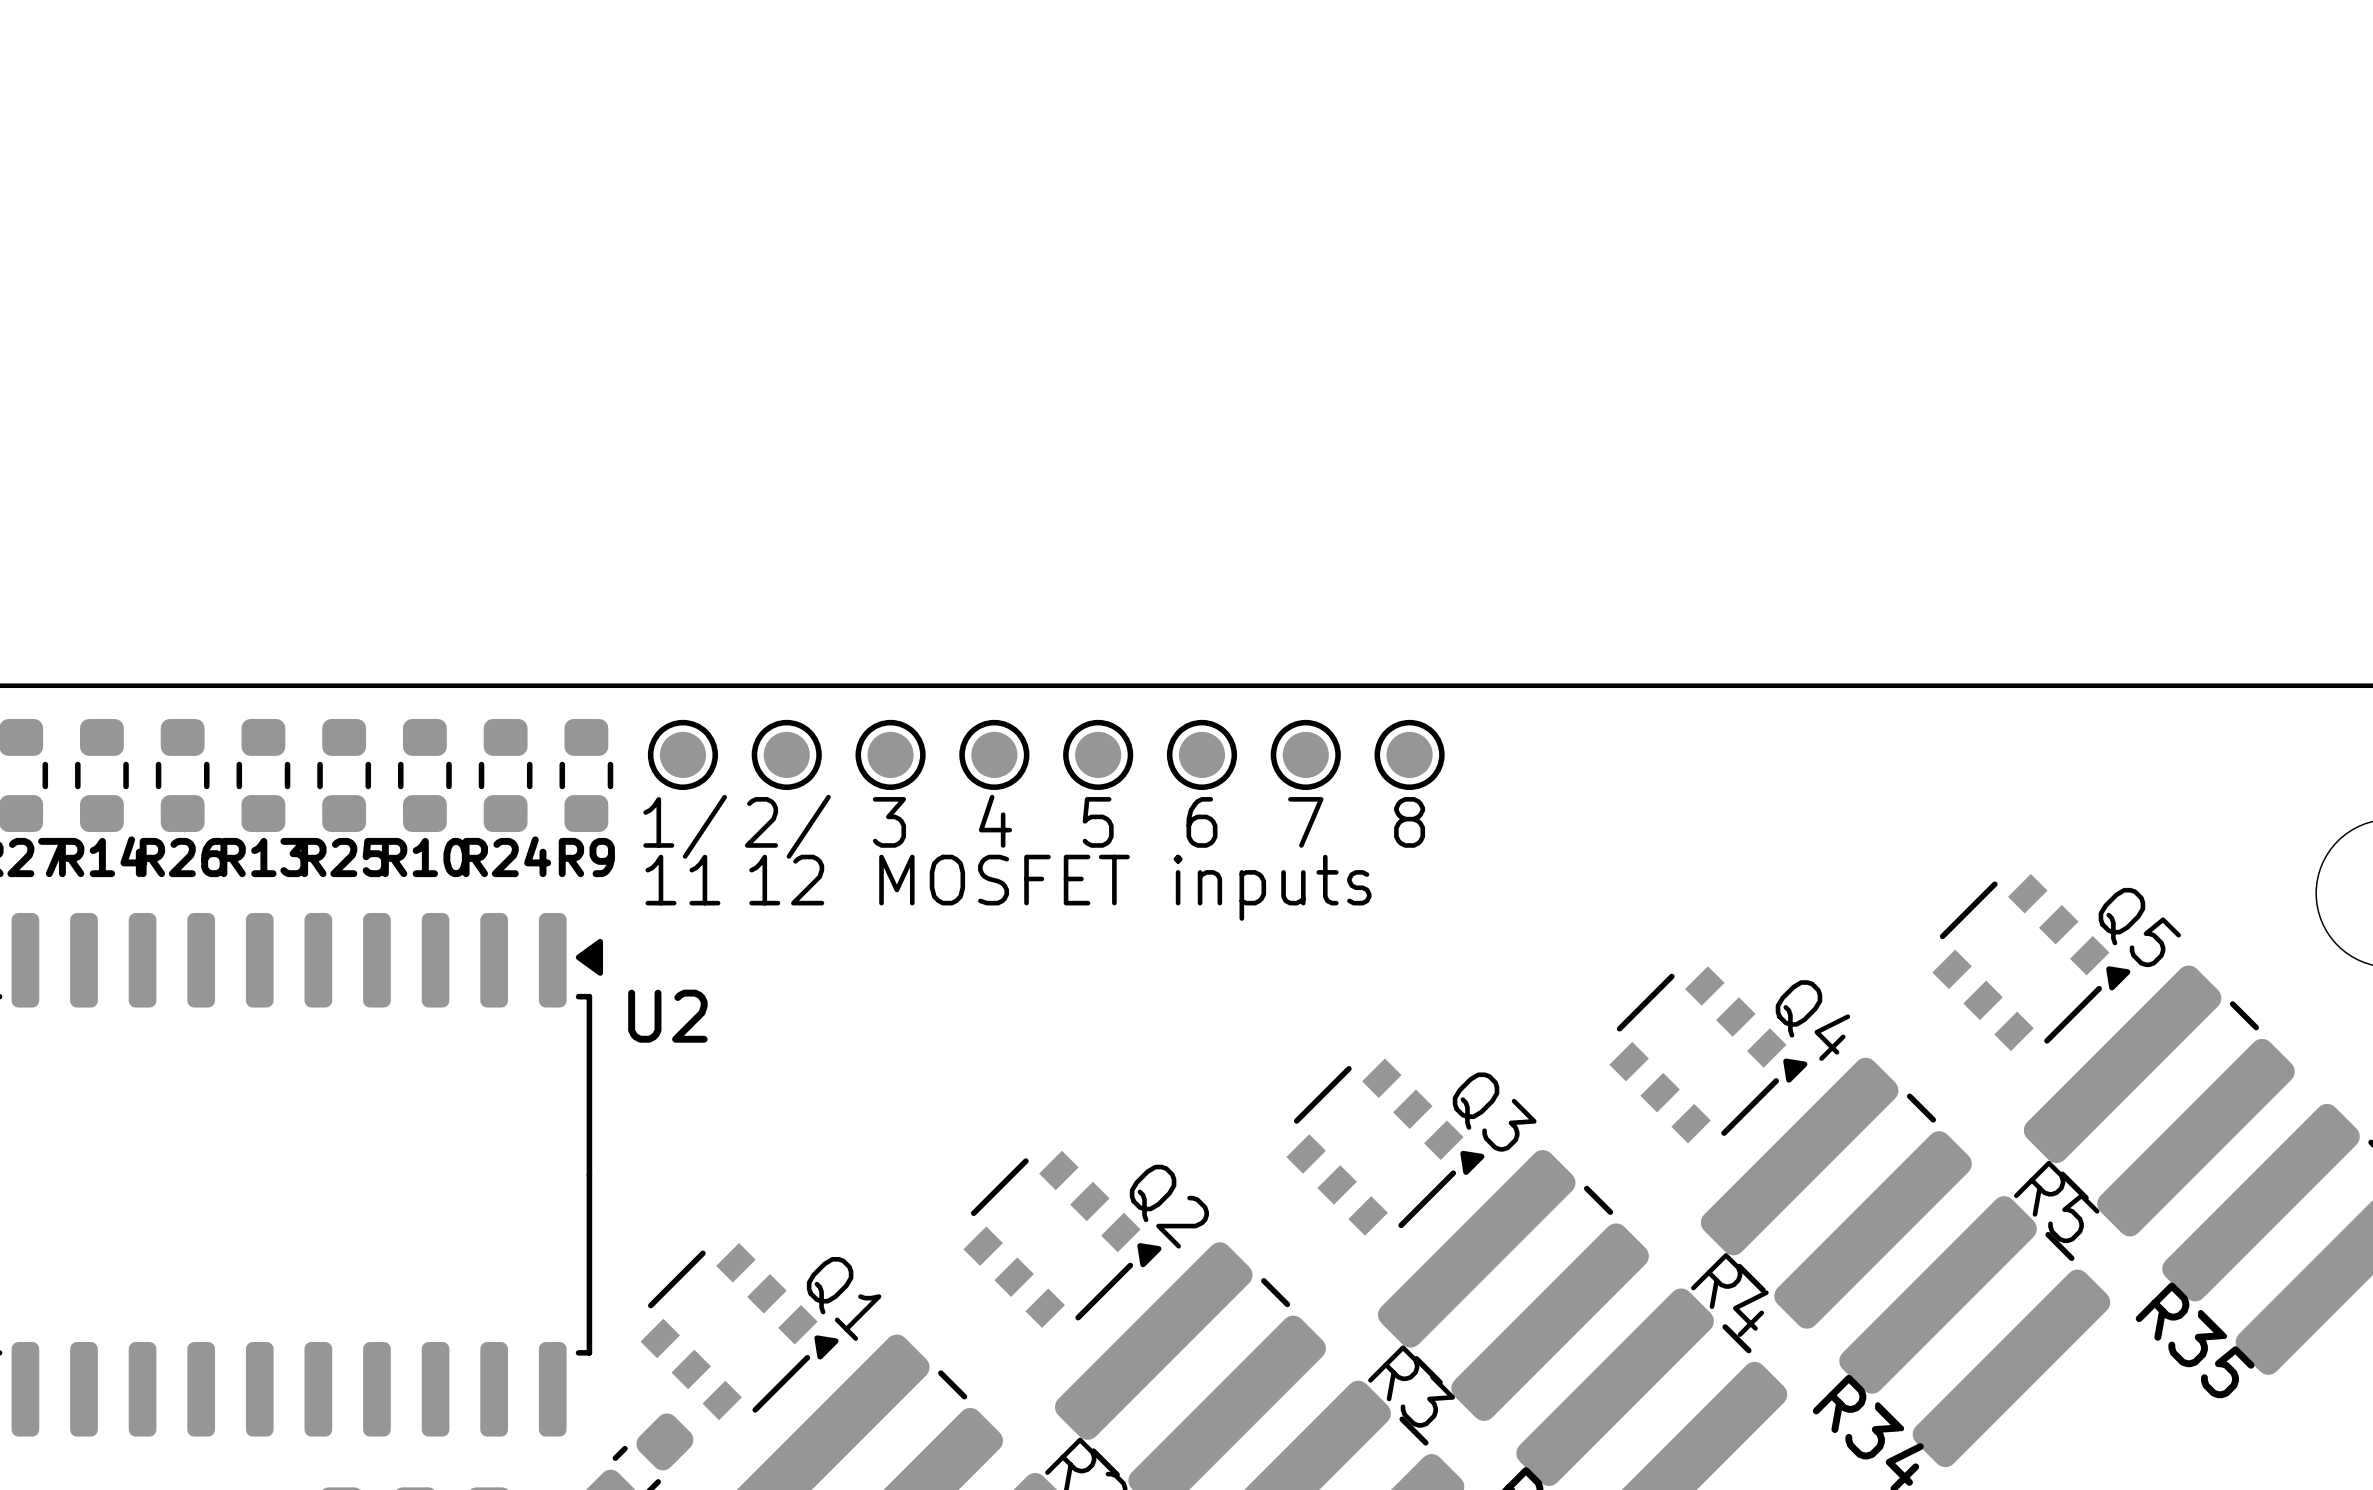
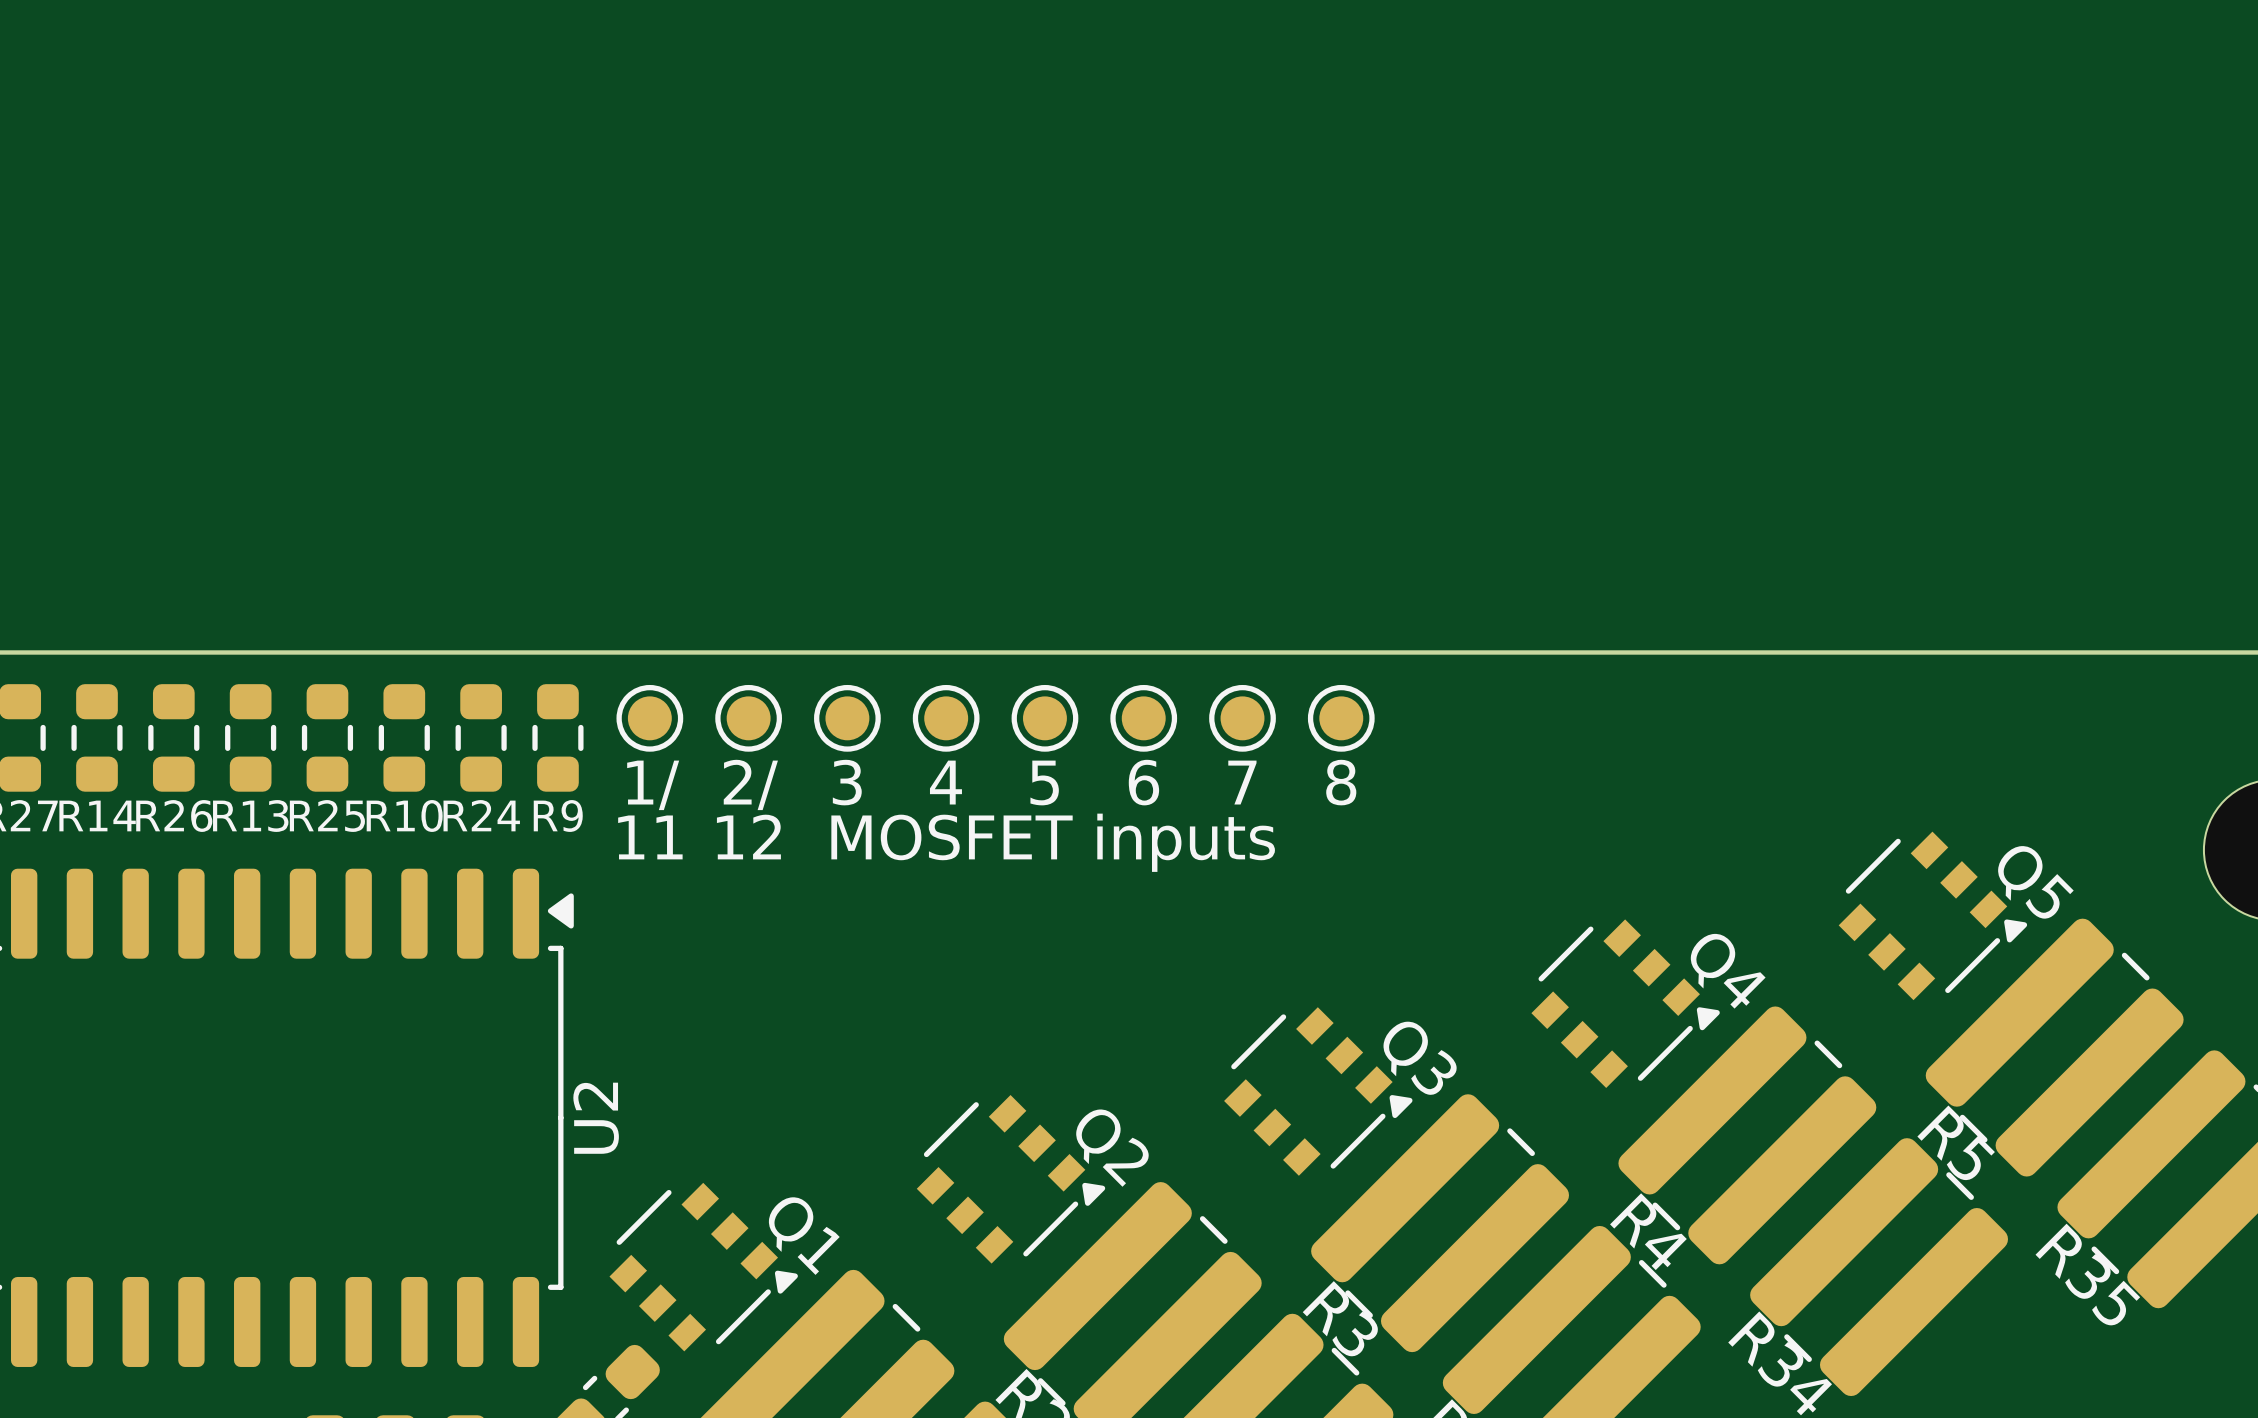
U2 name rotation: 0° (667, 1016) -> 90° counterclockwise (596, 1118)
U2 name position: U2 (667, 1016) -> U2 (596, 1118)

